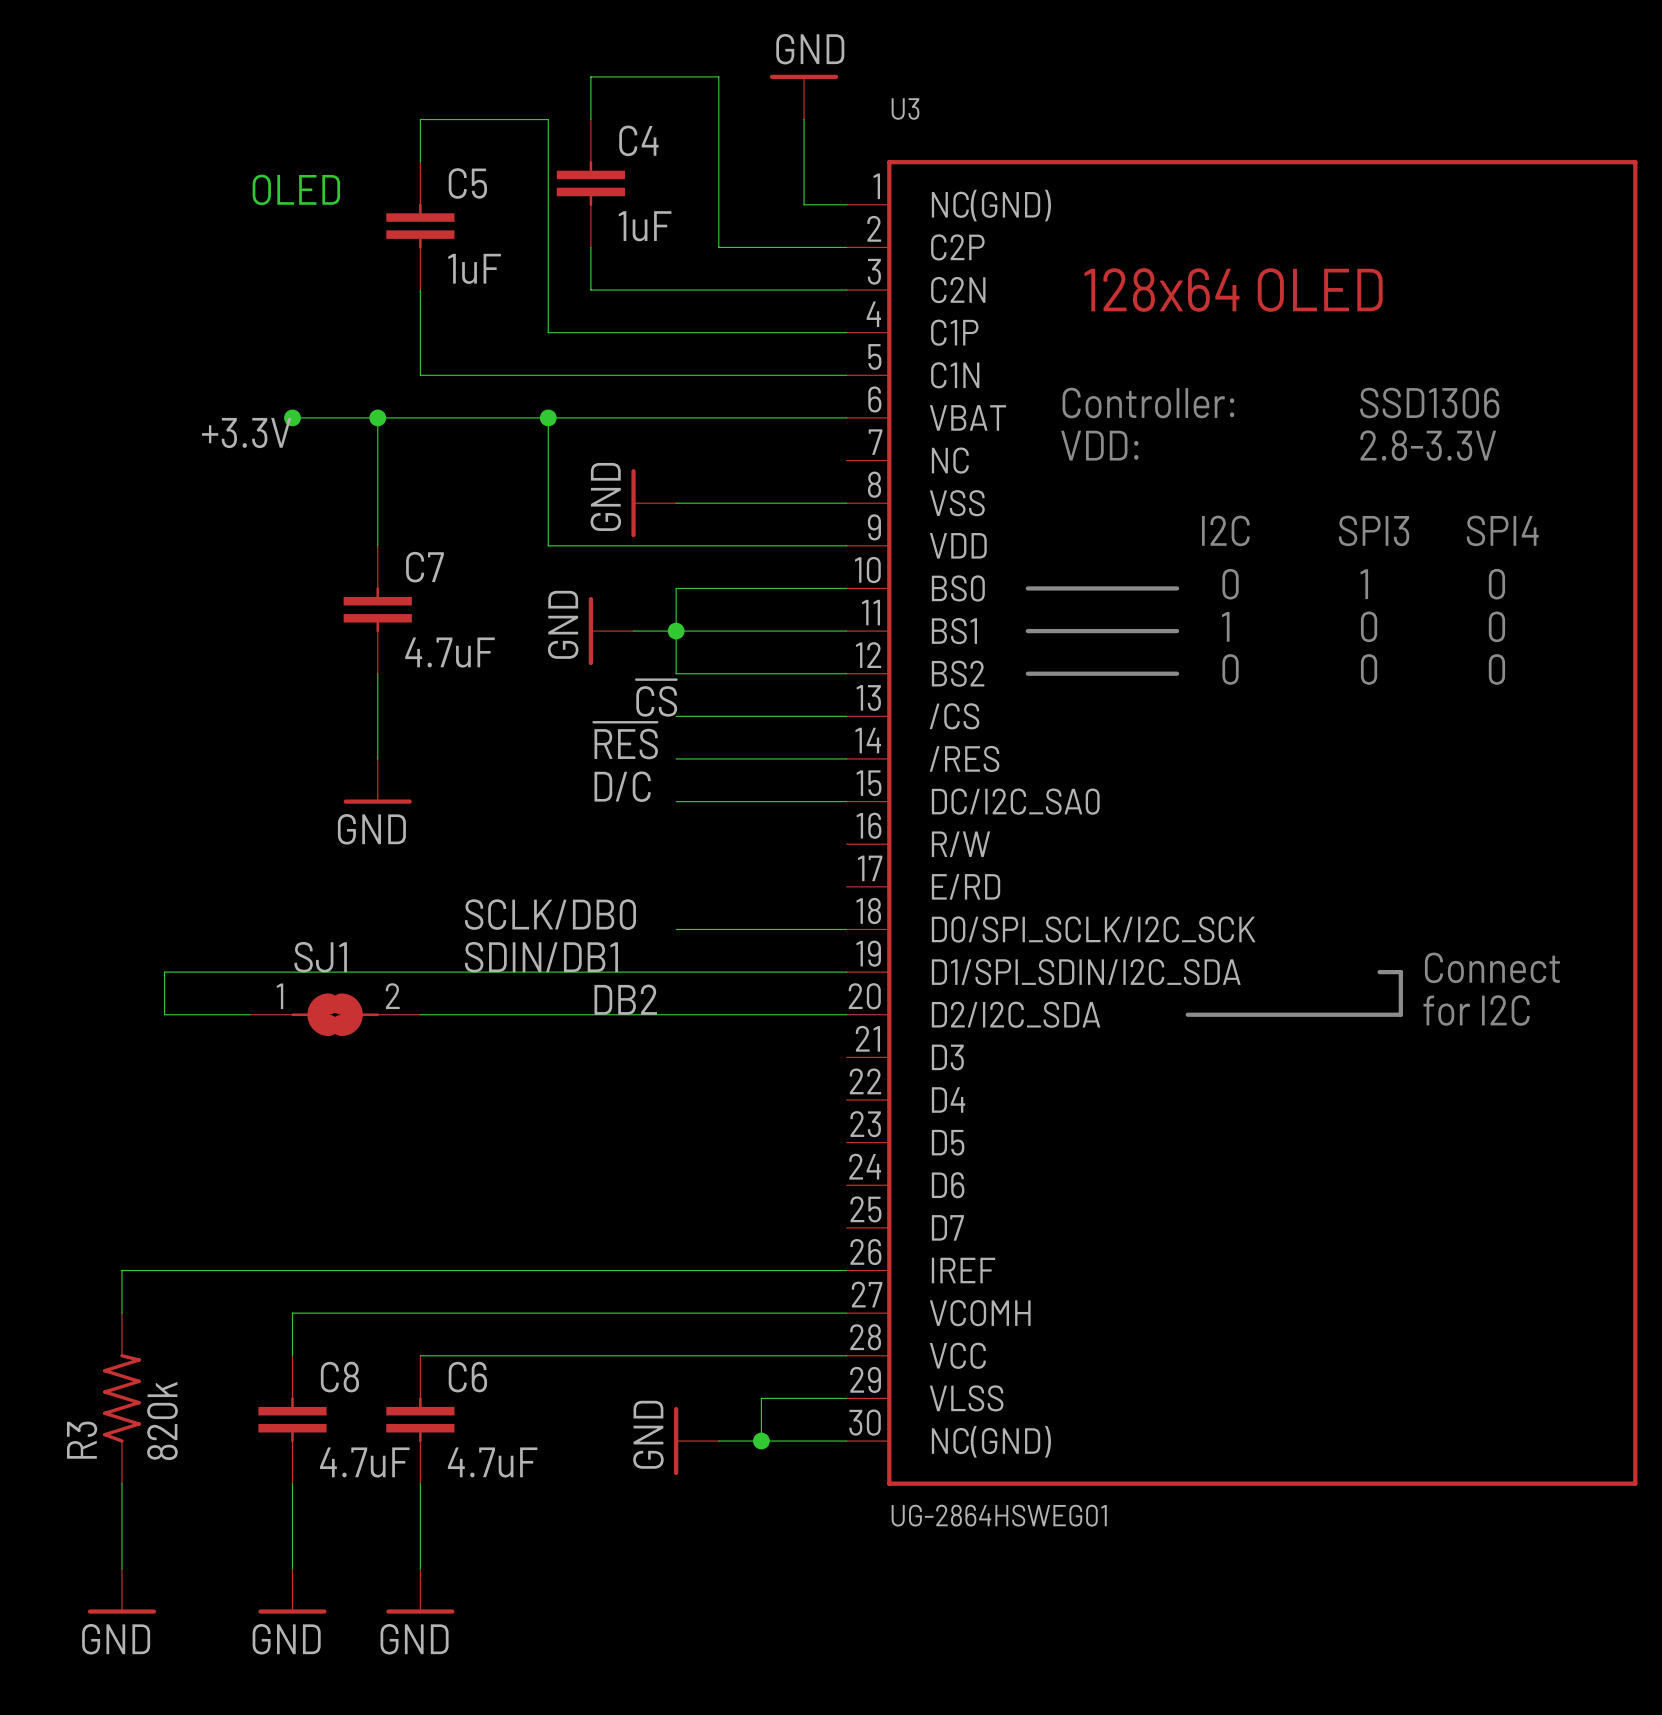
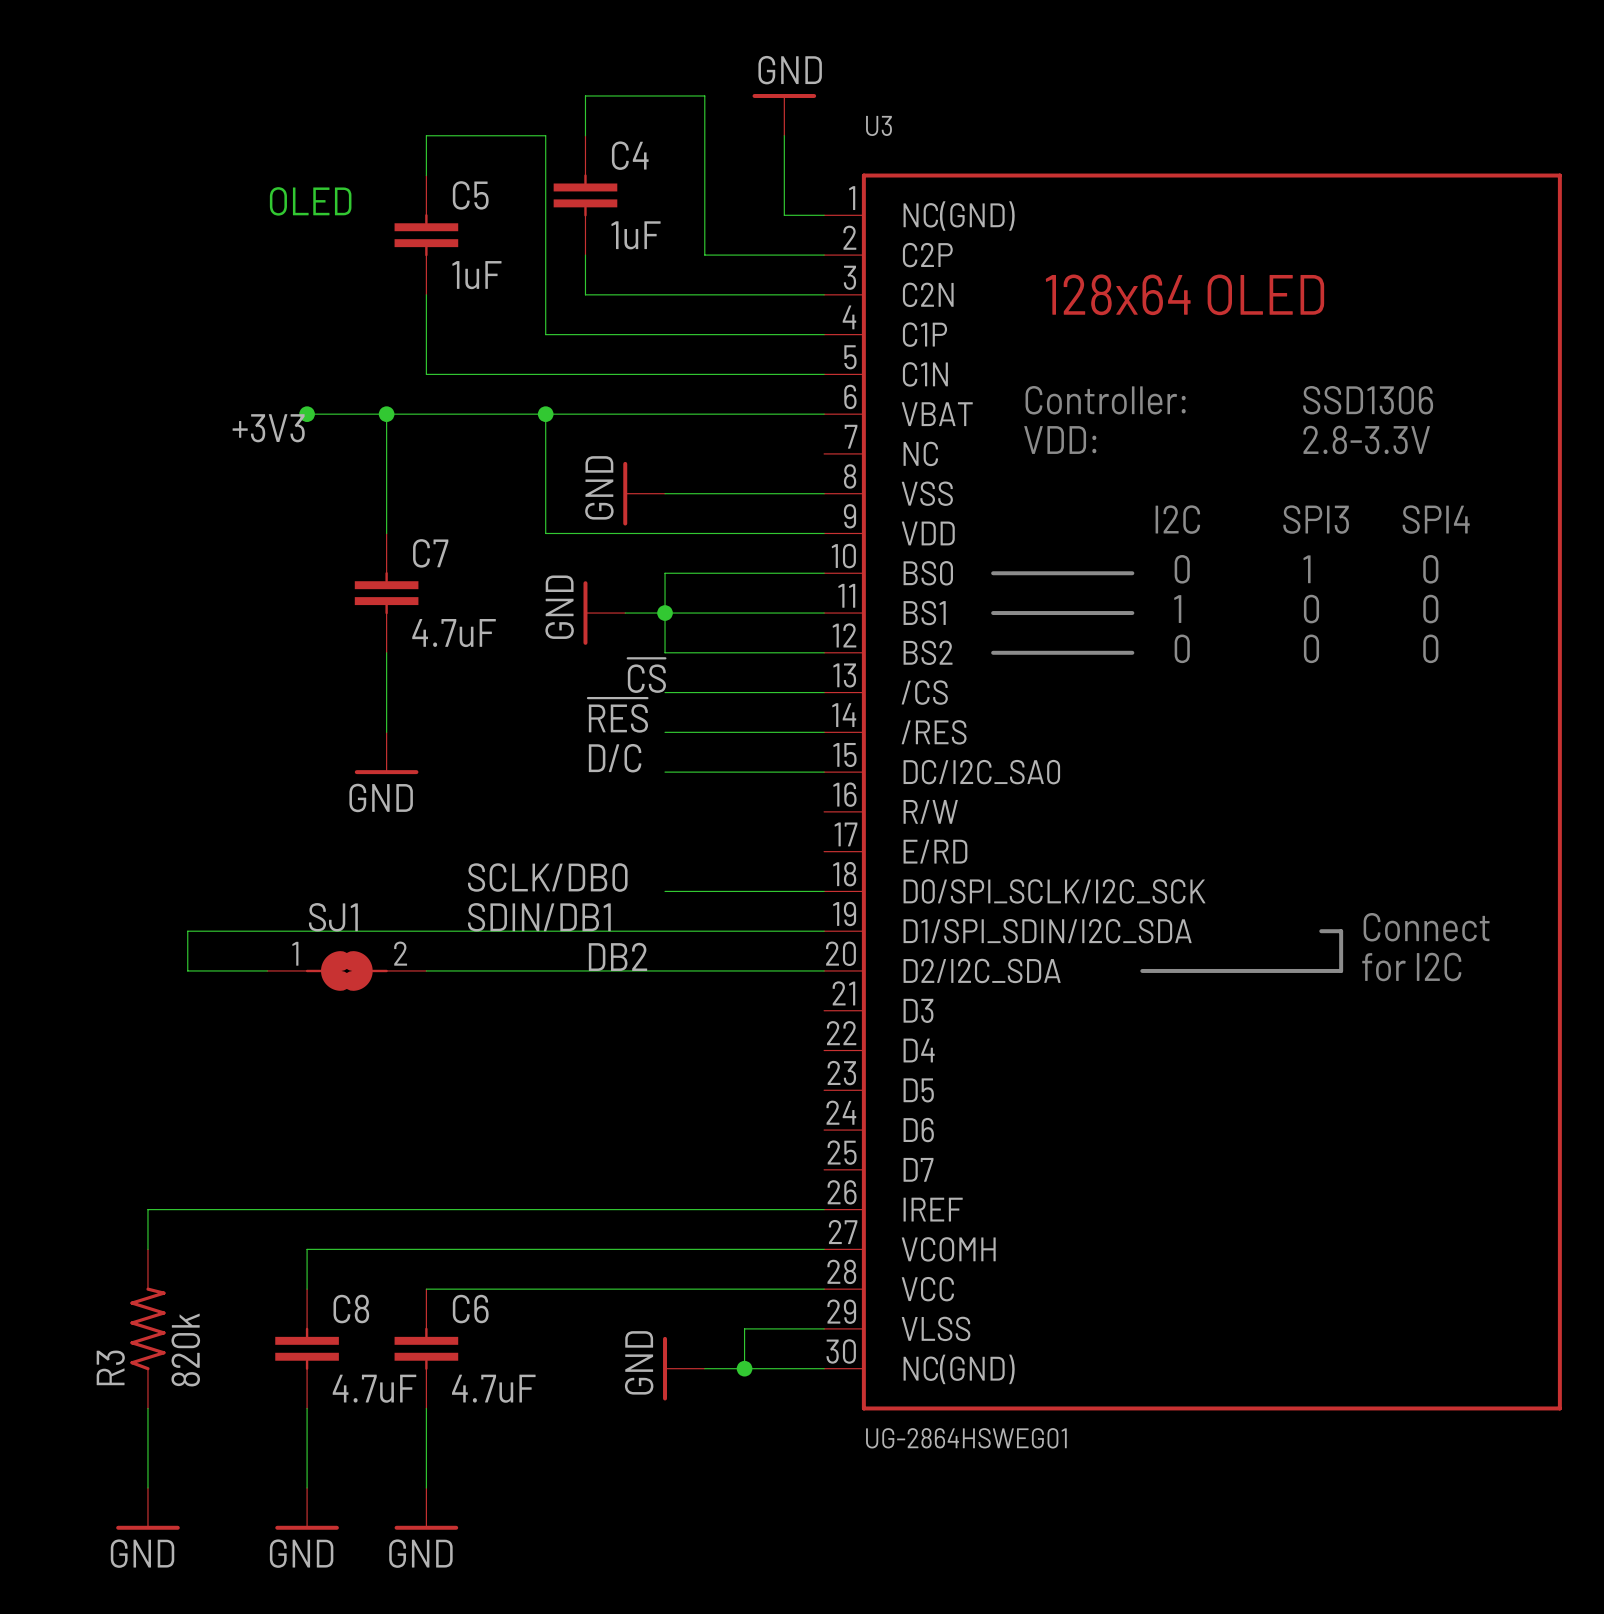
label: +3.3V (246, 433) -> +3V3 (268, 428)

